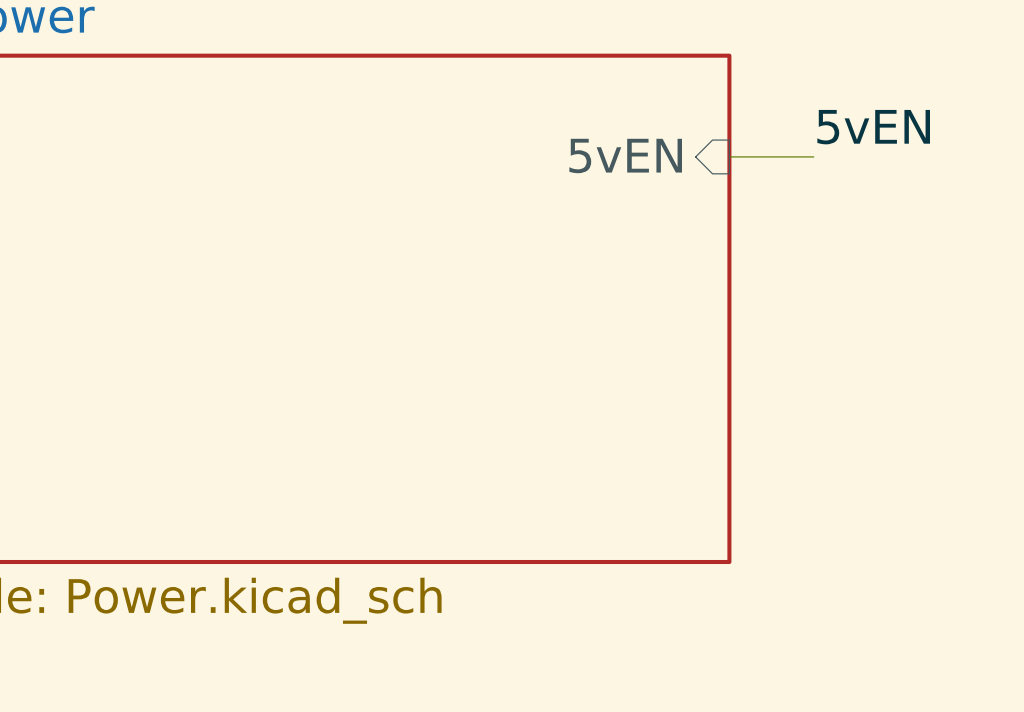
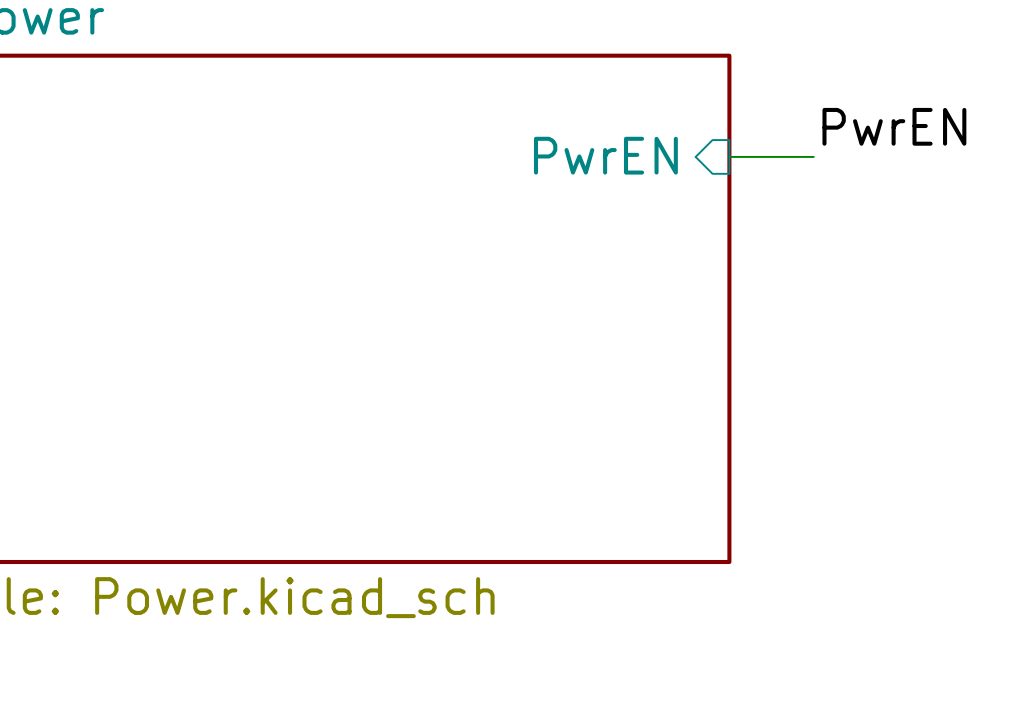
label: 5vEN (873, 127) -> PwrEN (894, 126)
sheet pin: 5vEN (625, 156) -> PwrEN (605, 155)

